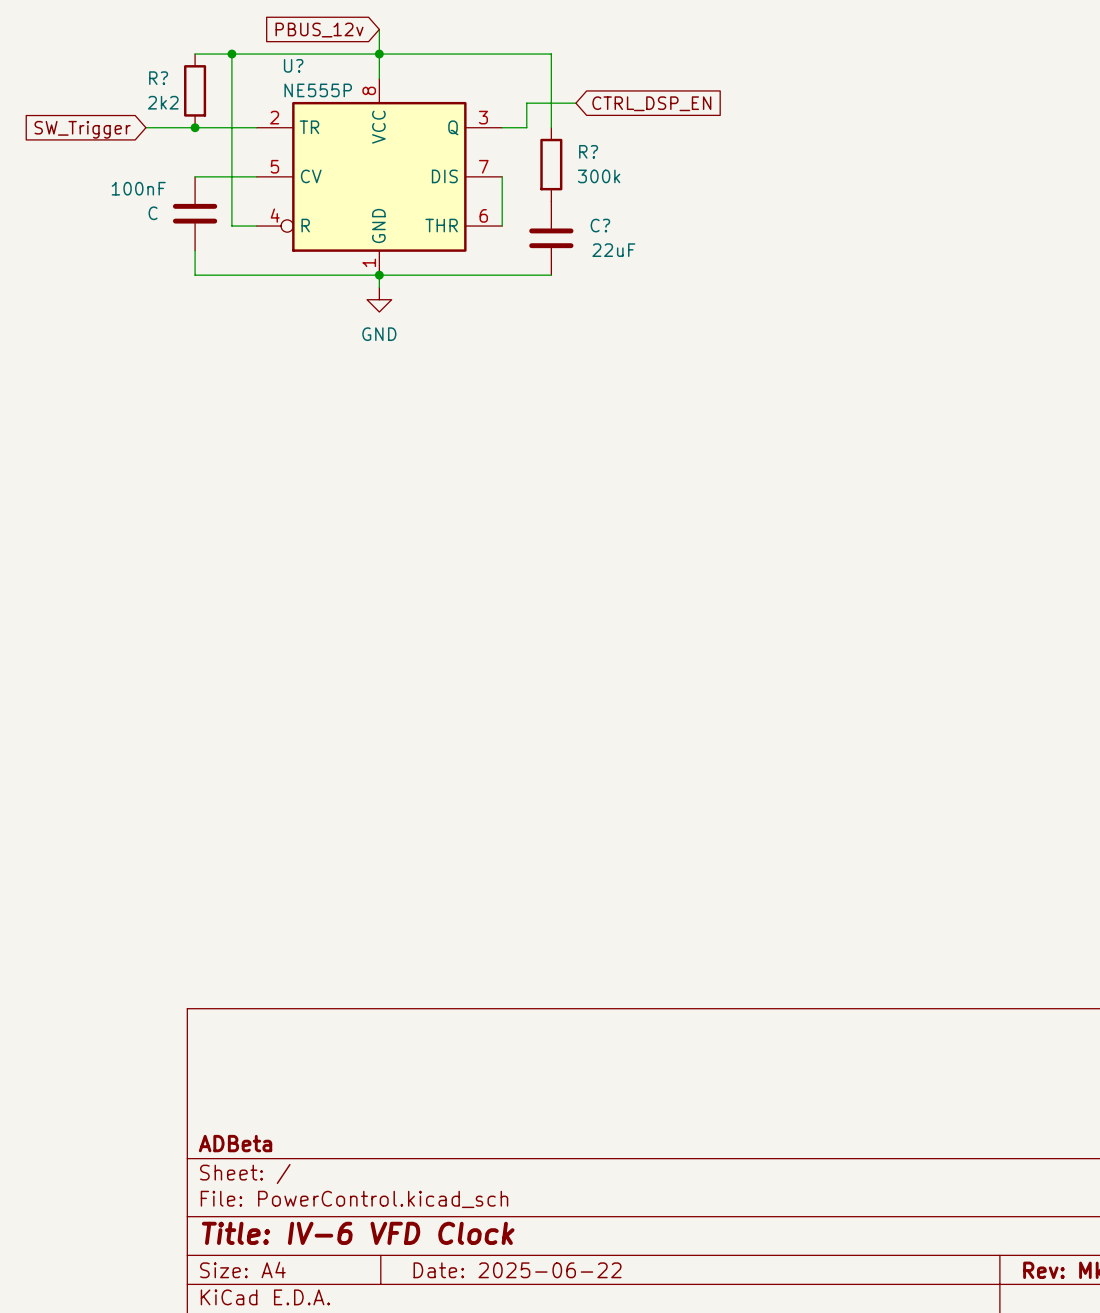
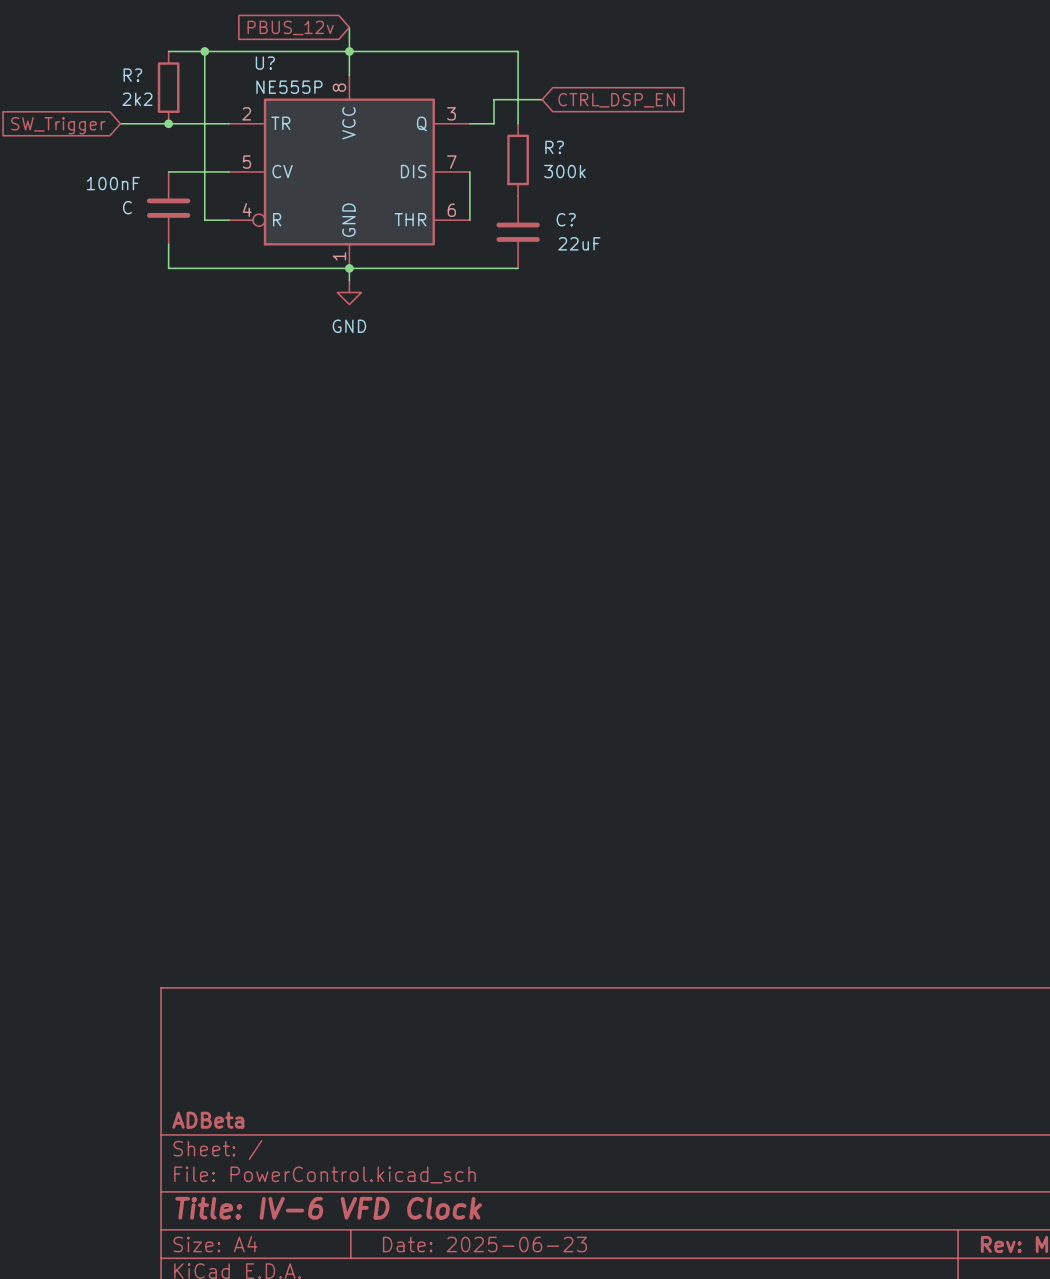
title block: Date: 2025-06-22 (517, 1270) -> Date: 2025-06-23 (484, 1244)

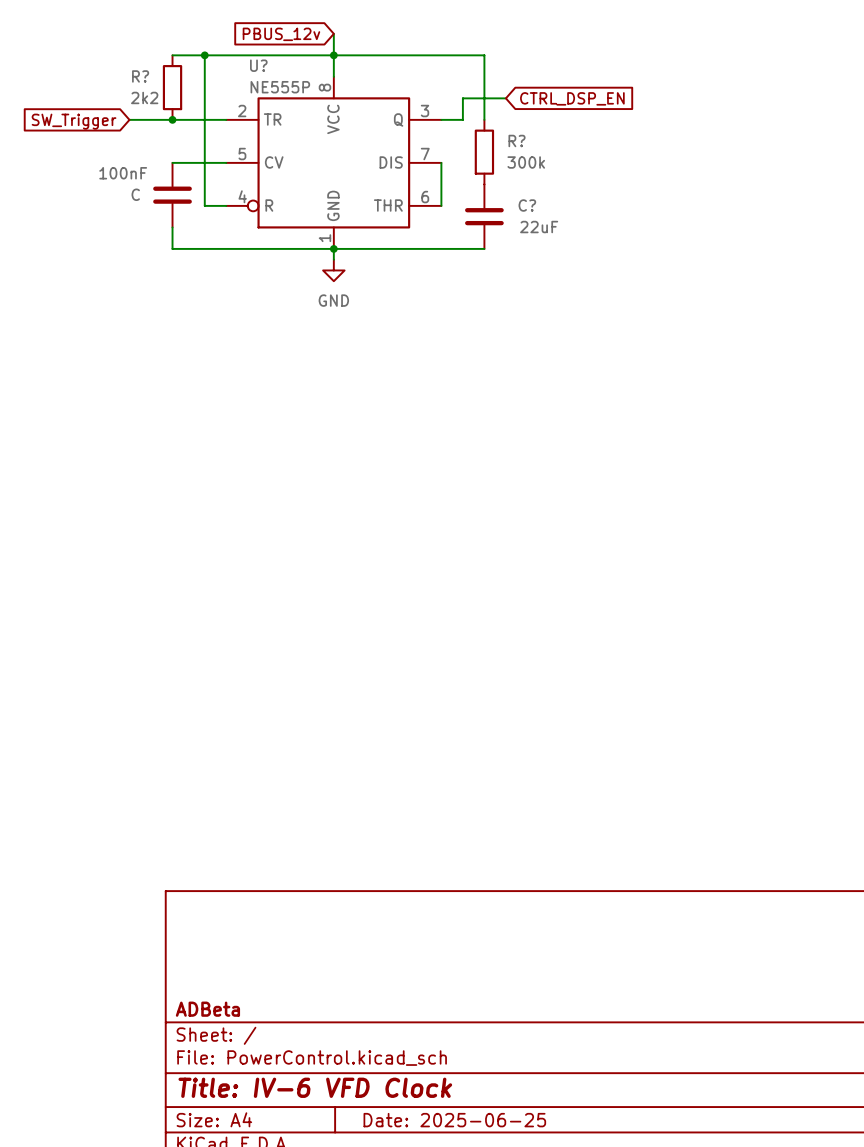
title block: Date: 2025-06-23 (484, 1244) -> Date: 2025-06-25 (454, 1120)

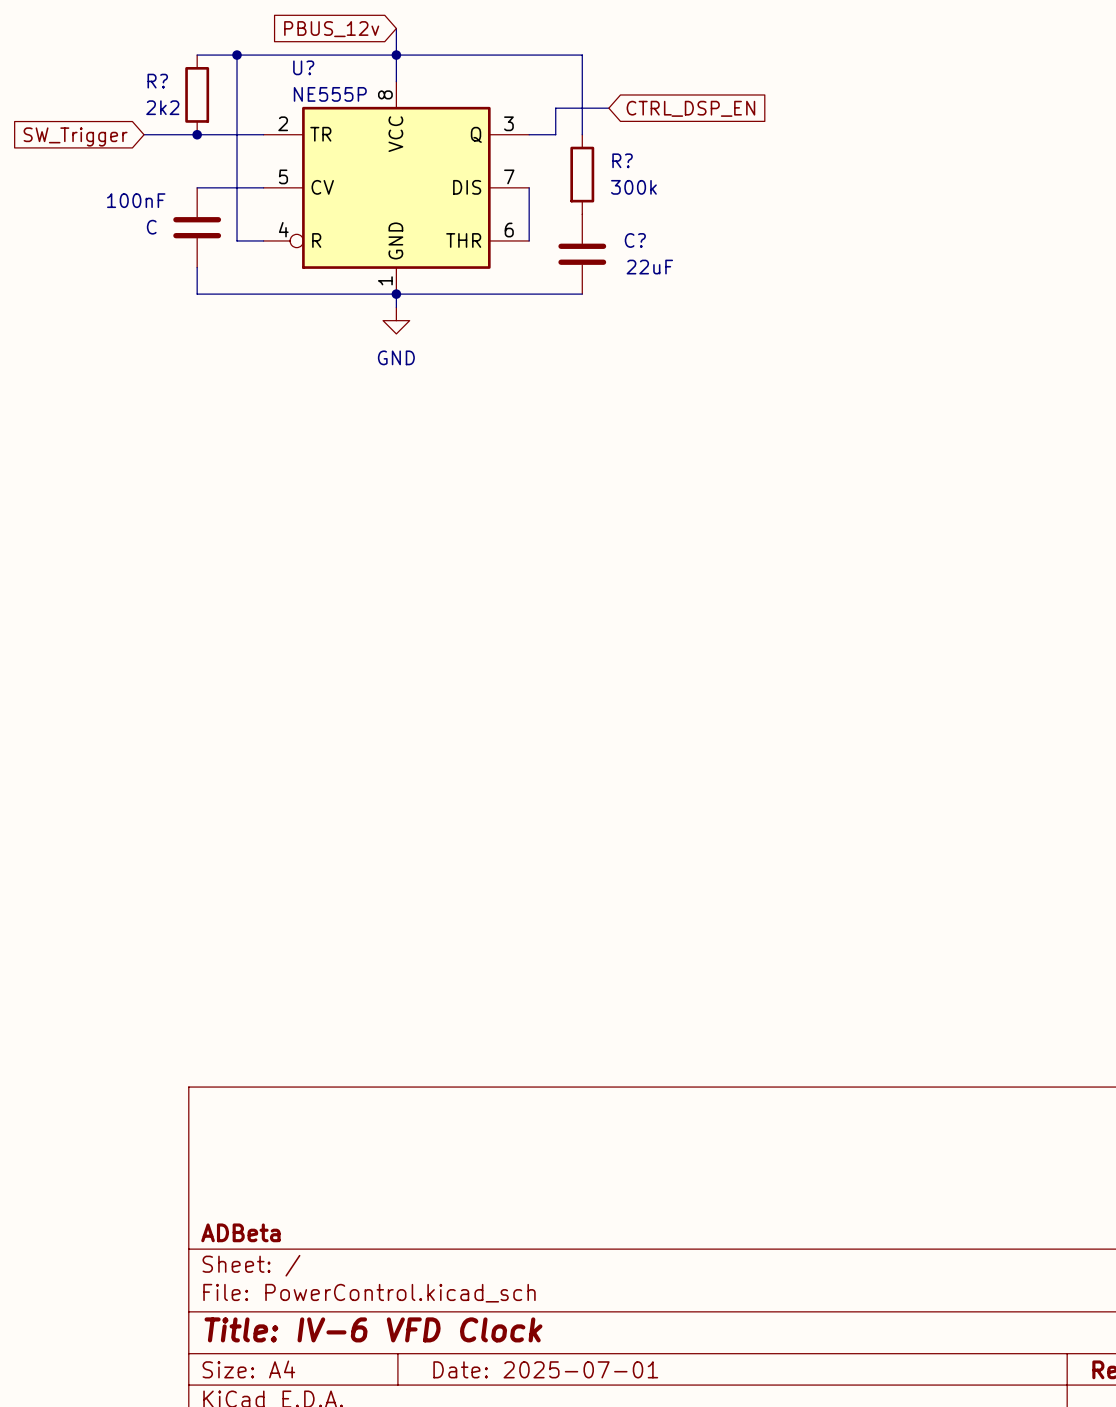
title block: Date: 2025-06-25 (454, 1120) -> Date: 2025-07-01 (545, 1369)

